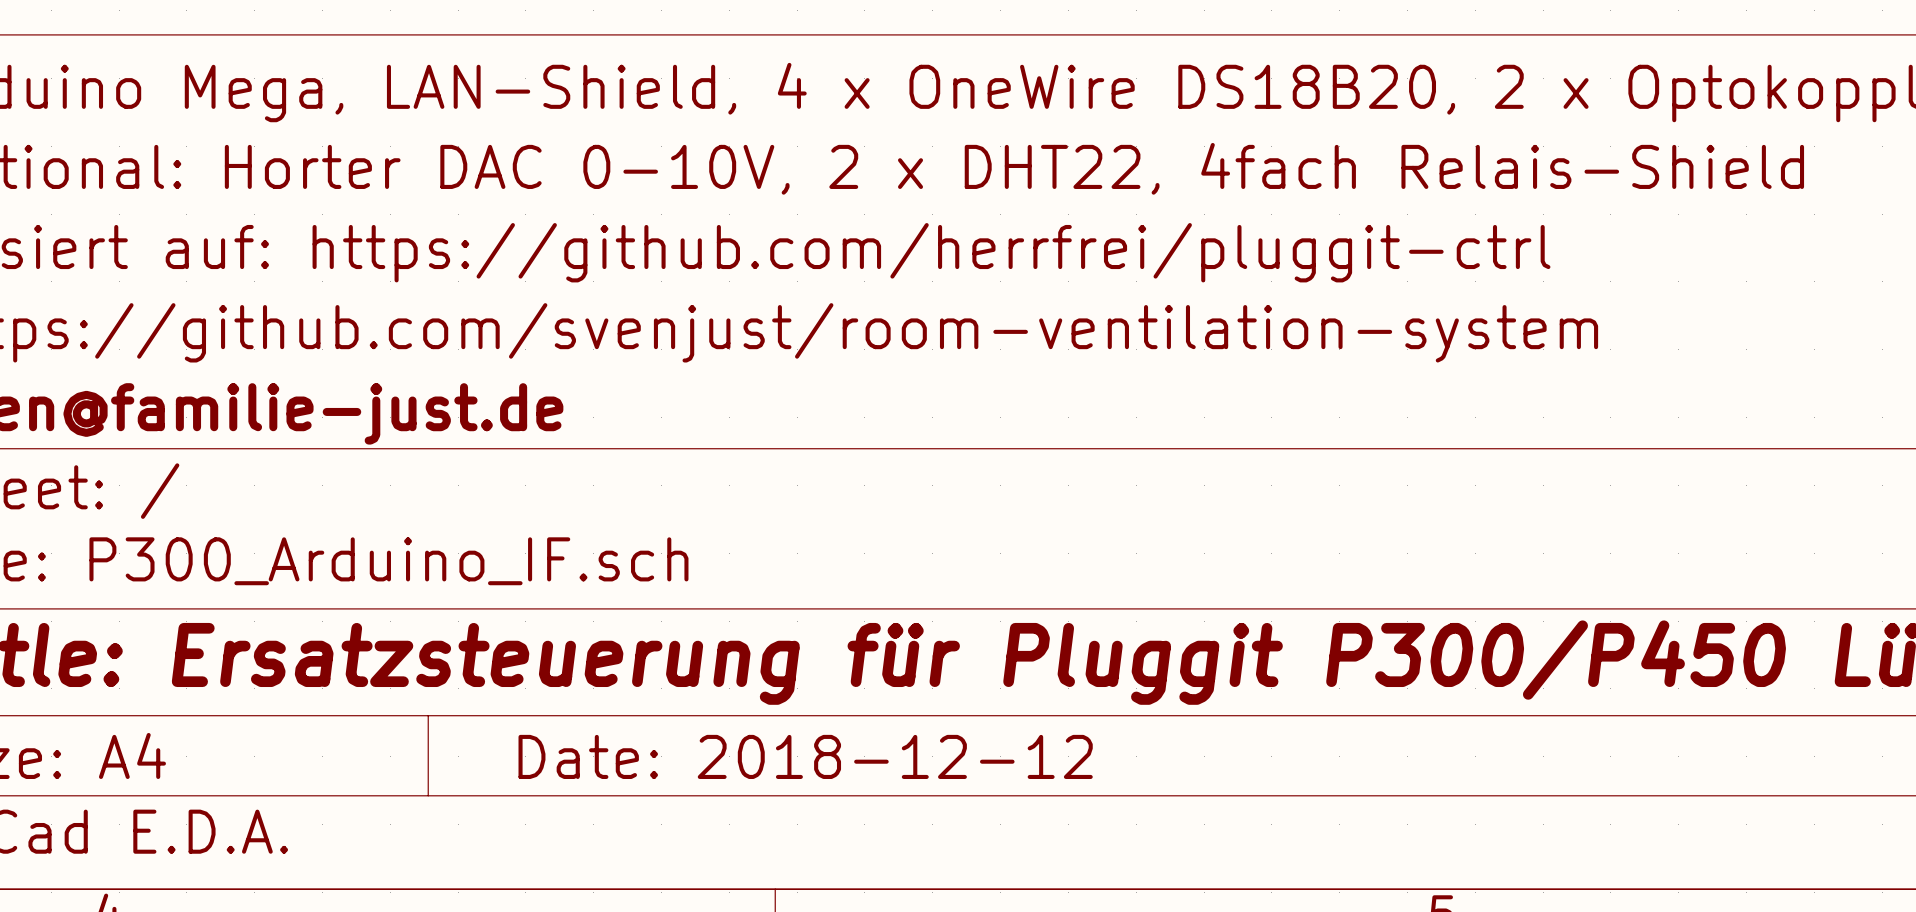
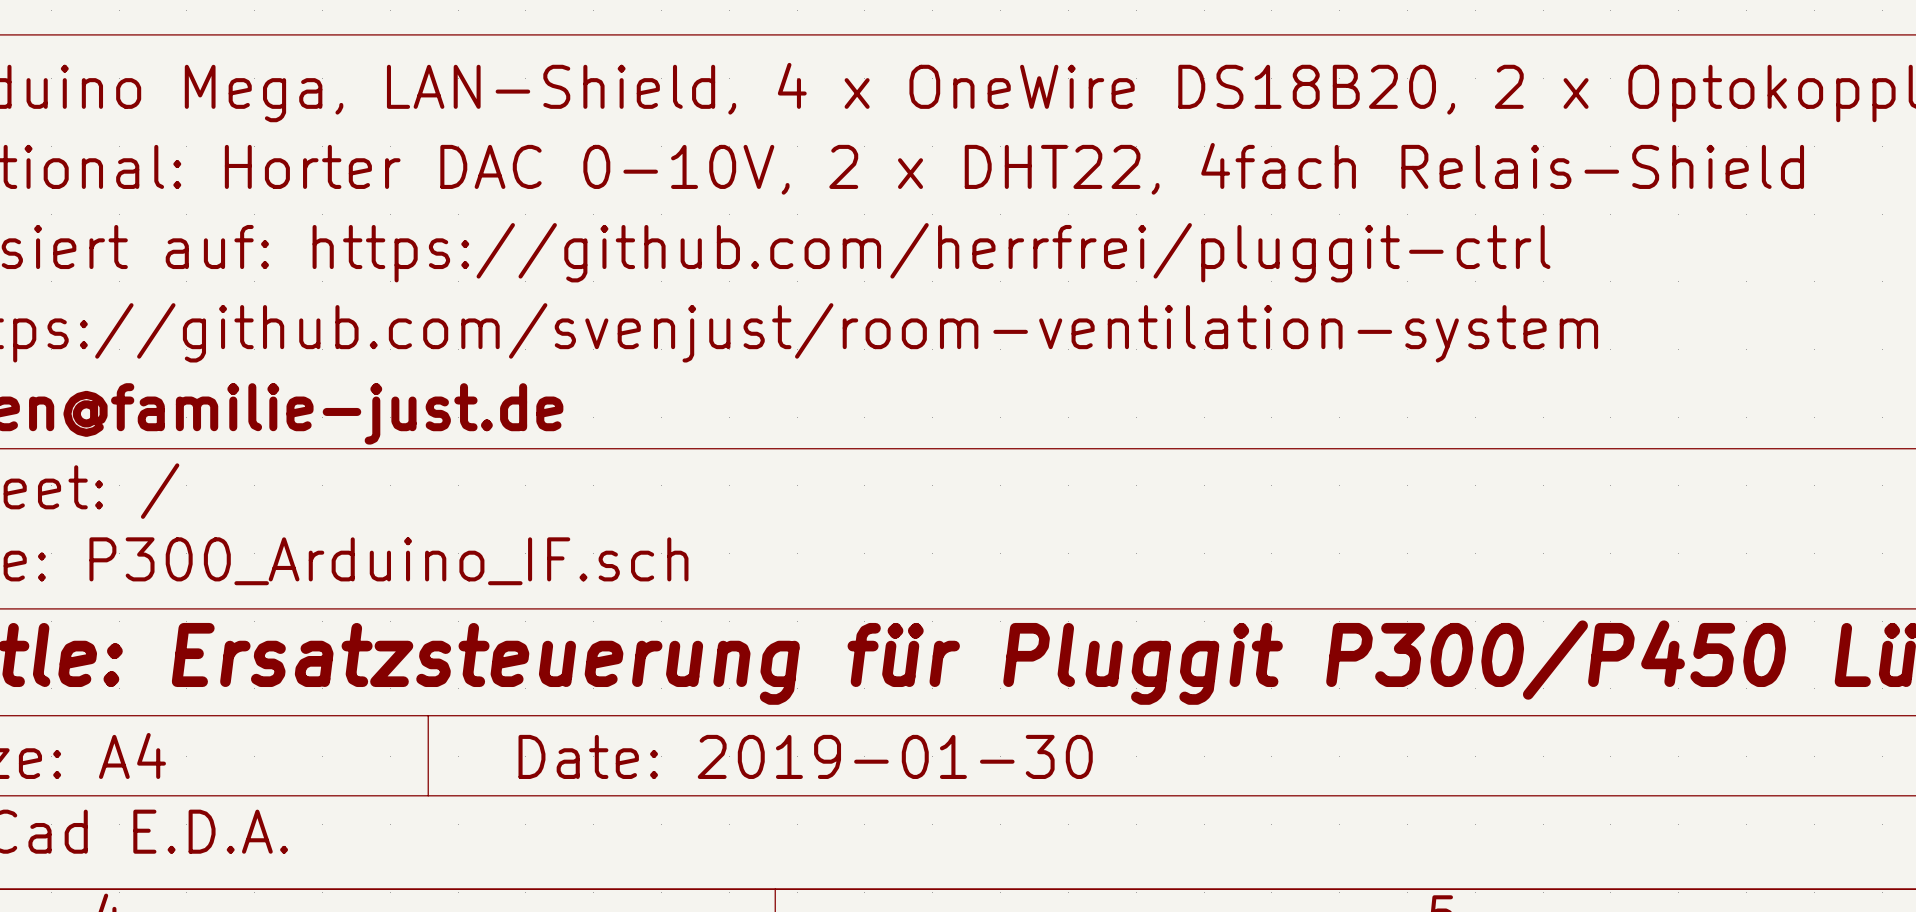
title block: Date: 2018-12-12 (805, 756) -> Date: 2019-01-30 (805, 756)

